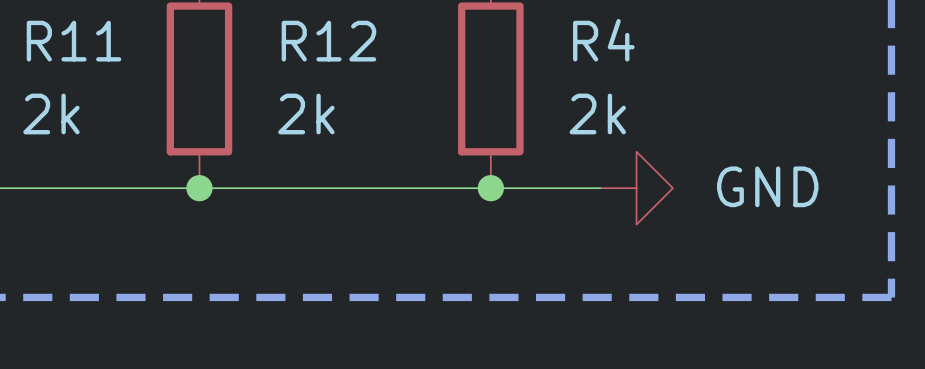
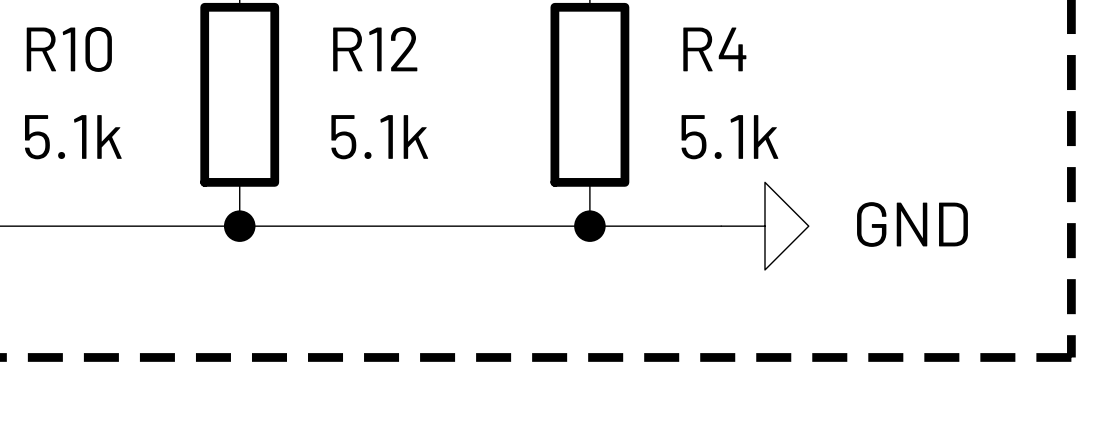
R11 name: R11 (74, 41) -> R10 (69, 49)
R11 value: 2k (51, 113) -> 5.1k (73, 137)
R12 value: 2k (306, 113) -> 5.1k (379, 137)
R4 value: 2k (597, 113) -> 5.1k (729, 137)

